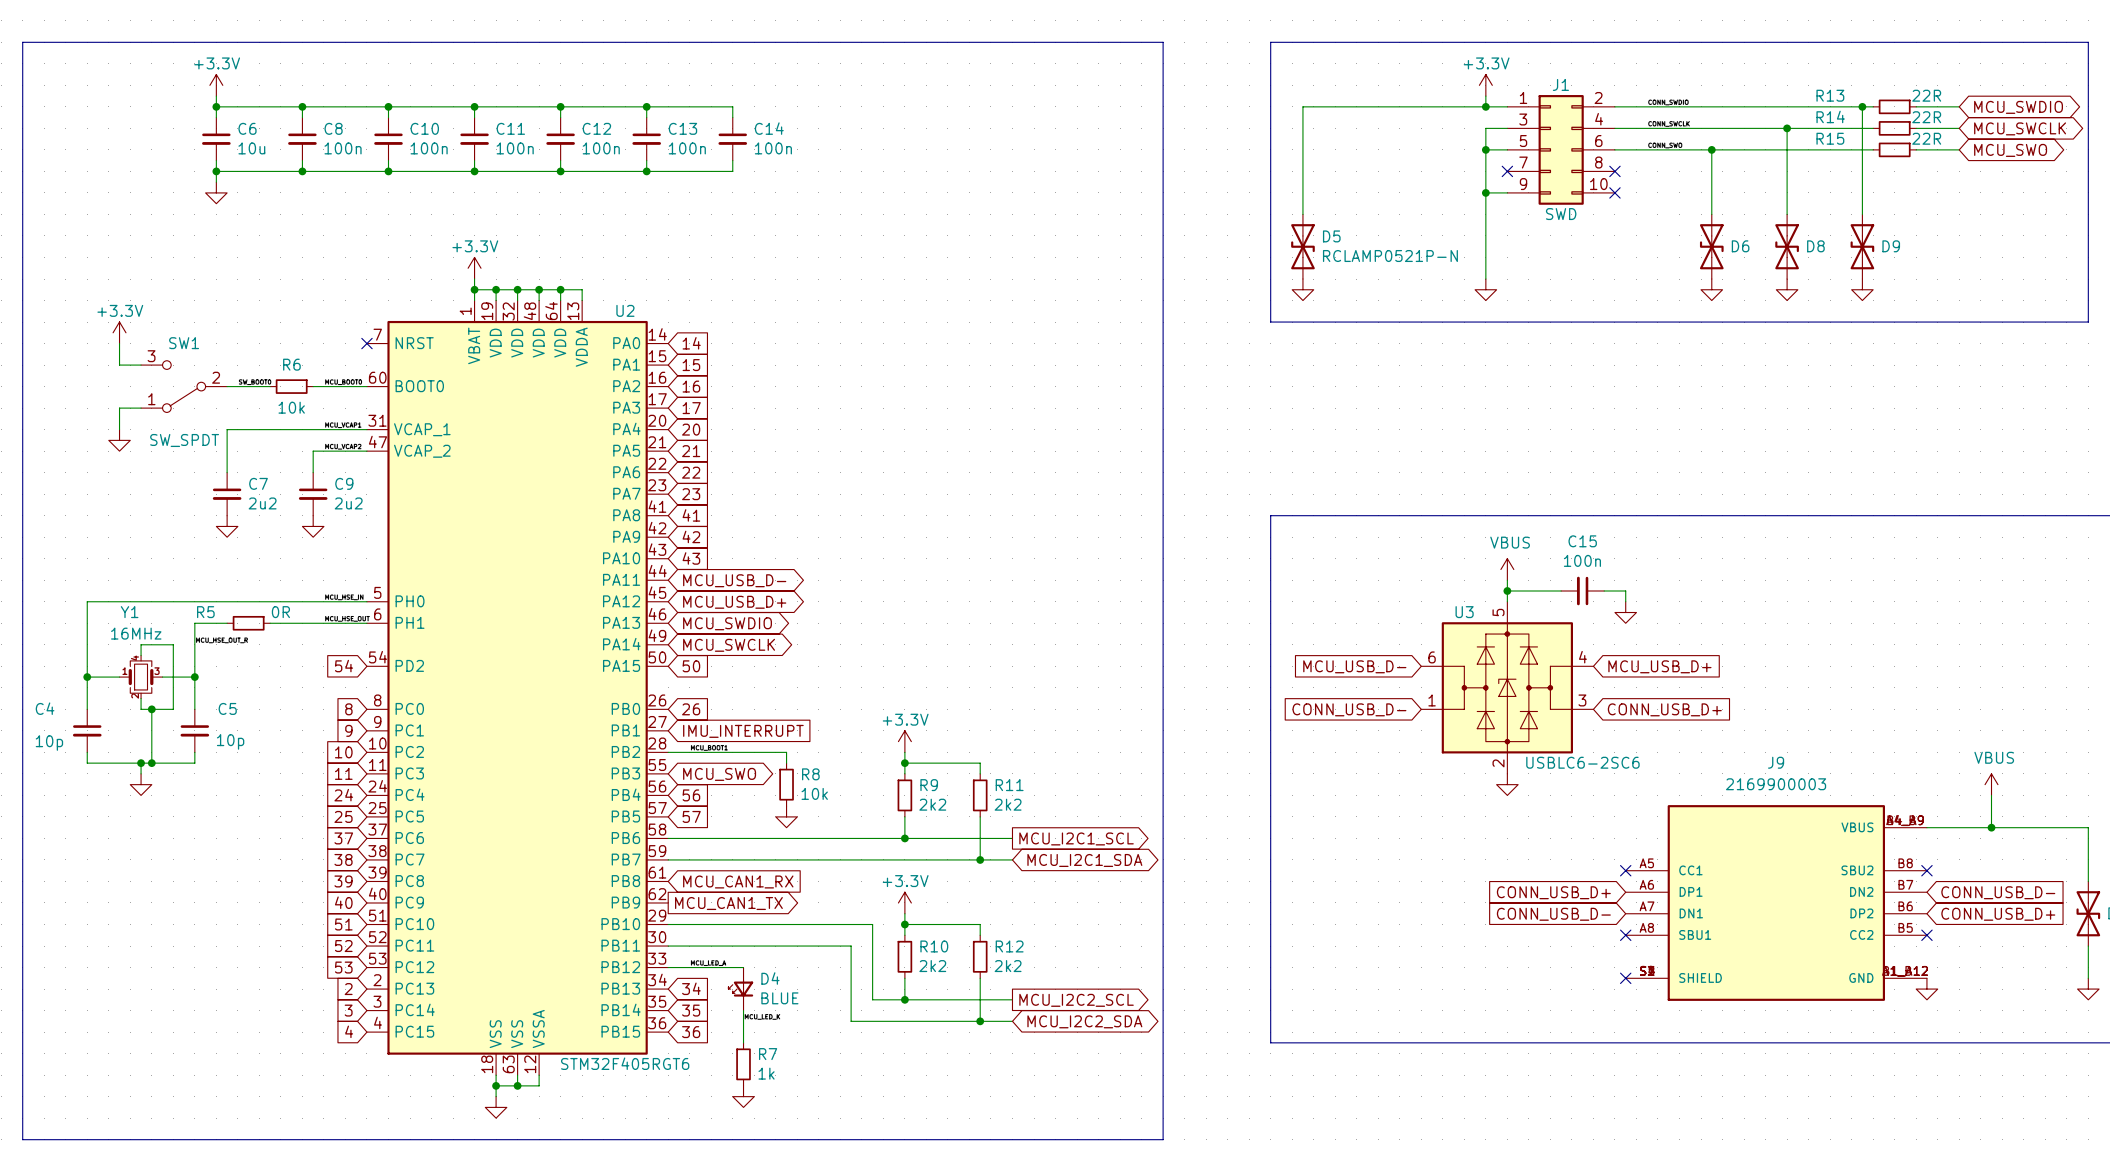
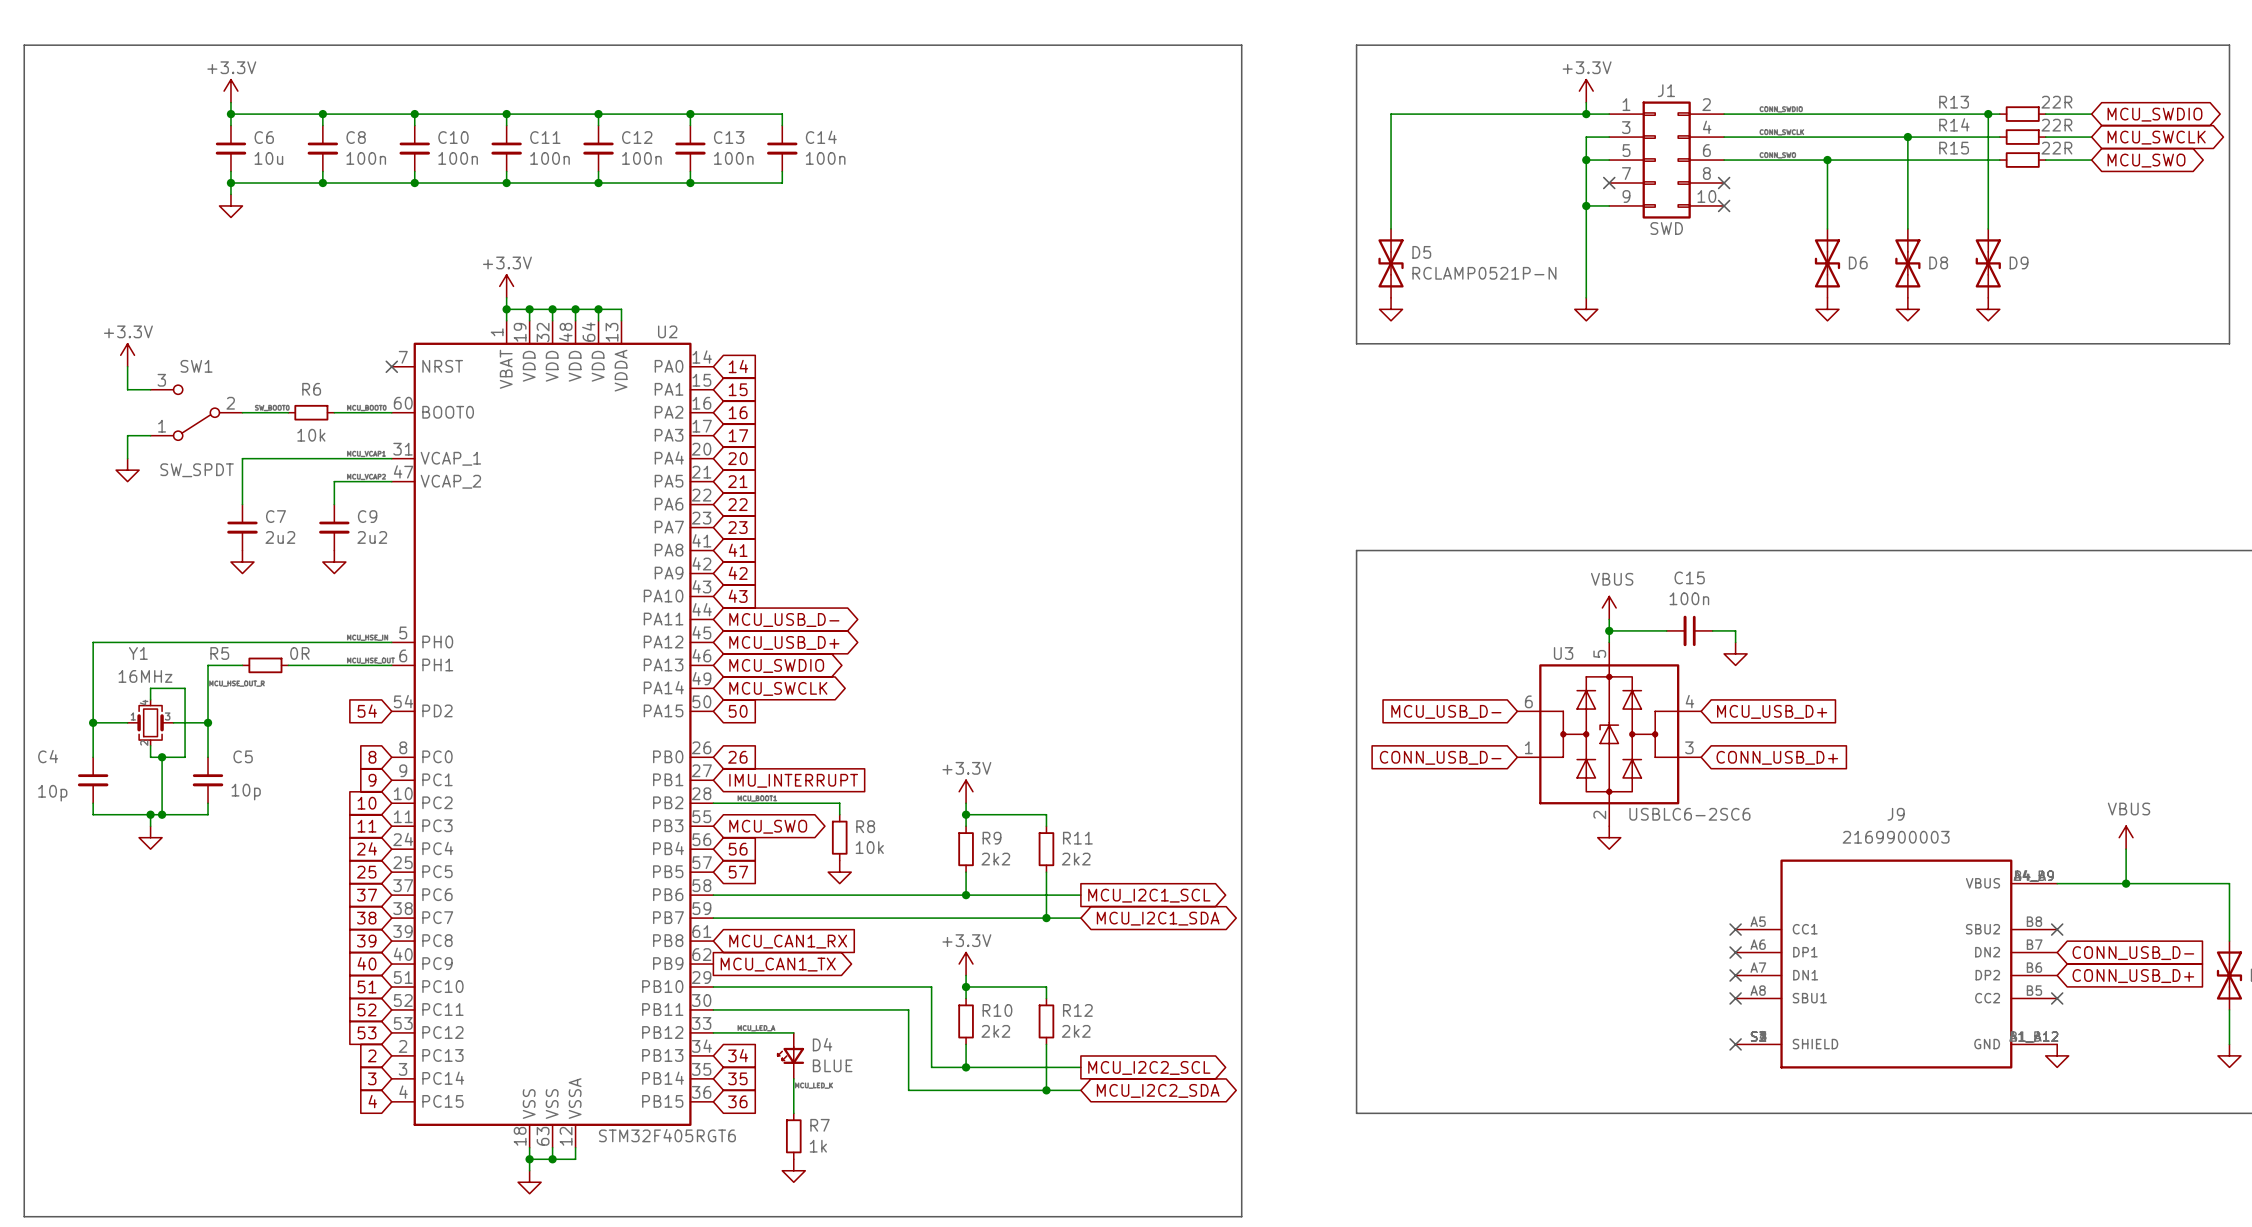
global label: CONN_USB_D+ (1553, 892) -> none
no-connect mark: none -> (1735, 952)
no-connect mark: none -> (1735, 975)
global label: CONN_USB_D- (1553, 914) -> none

